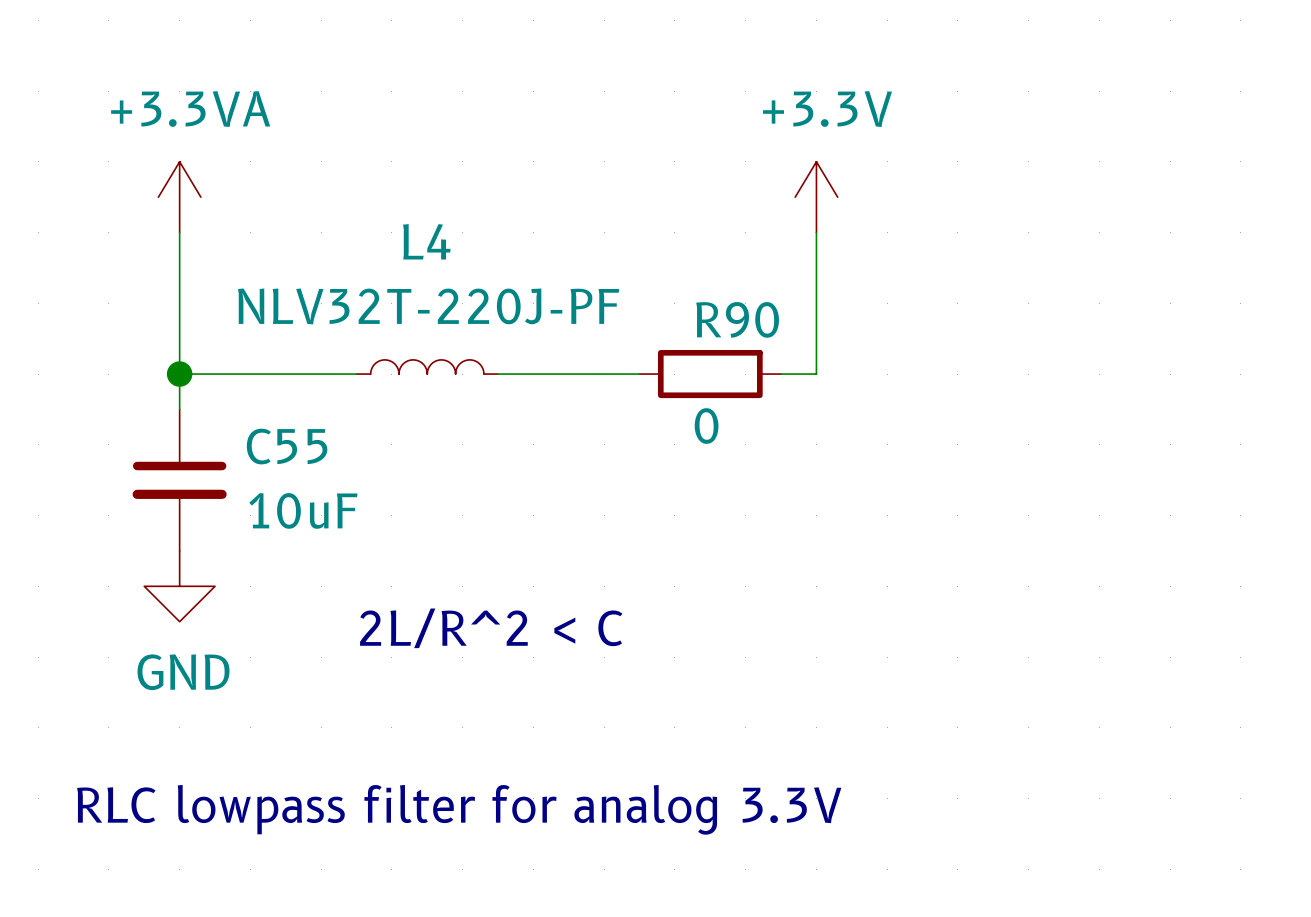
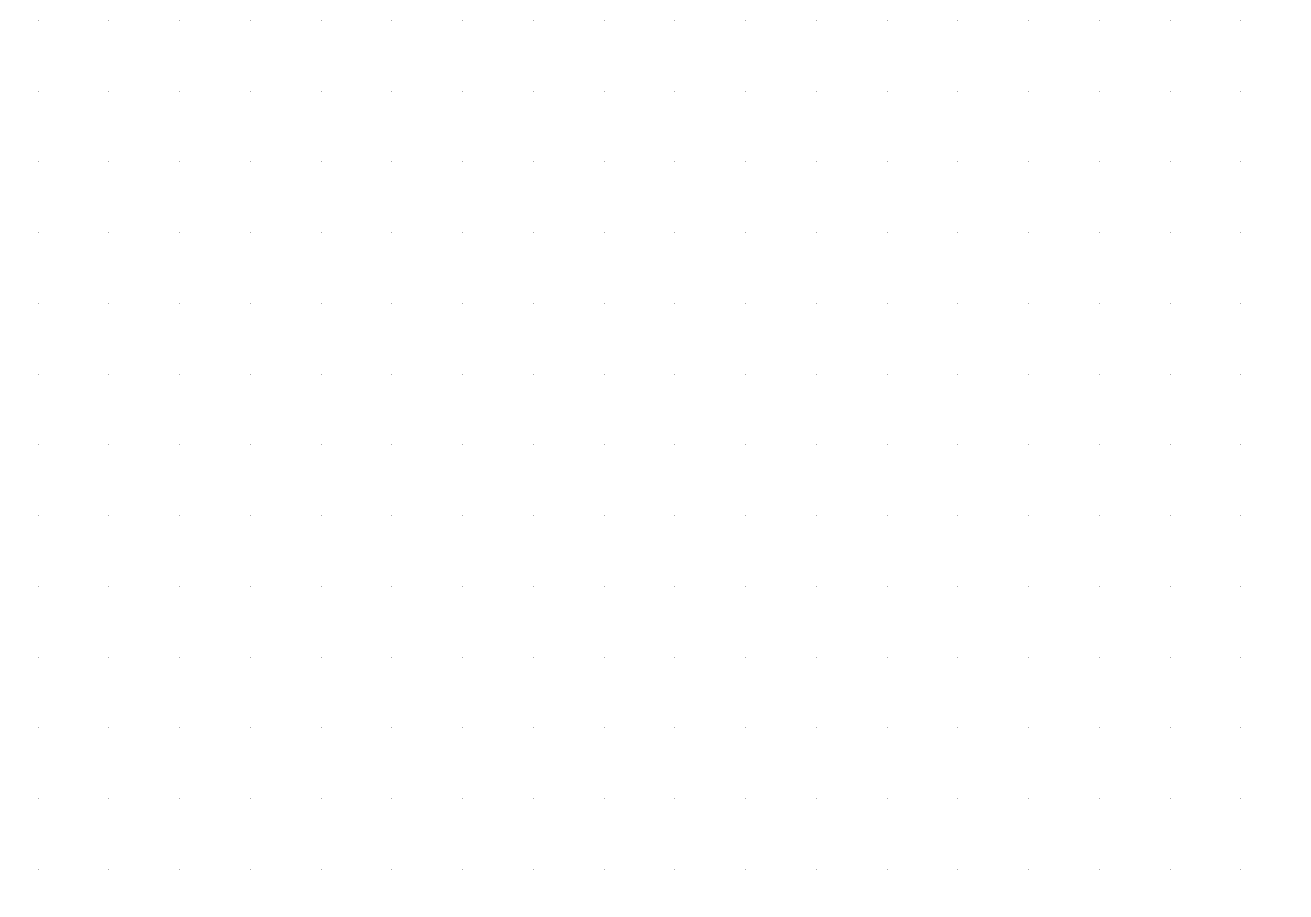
power symbol: +3.3VA (179, 197) -> none
power symbol: +3.3V (816, 197) -> none
wire: (179, 232) (179, 409) -> none
wire: (816, 232) (816, 374) (781, 374) -> none
L4: NLV32T-220J-PF (427, 366) -> none
wire: (179, 374) (356, 374) -> none
junction: (179, 374) -> none
wire: (498, 374) (639, 374) -> none
R90: 0 (710, 374) -> none
C55: 10uF (179, 480) -> none
power symbol: GND (179, 586) -> none
text: 2L/R^2 < C (491, 628) -> none
text: RLC lowpass filter for analog 3.3V (459, 809) -> none

